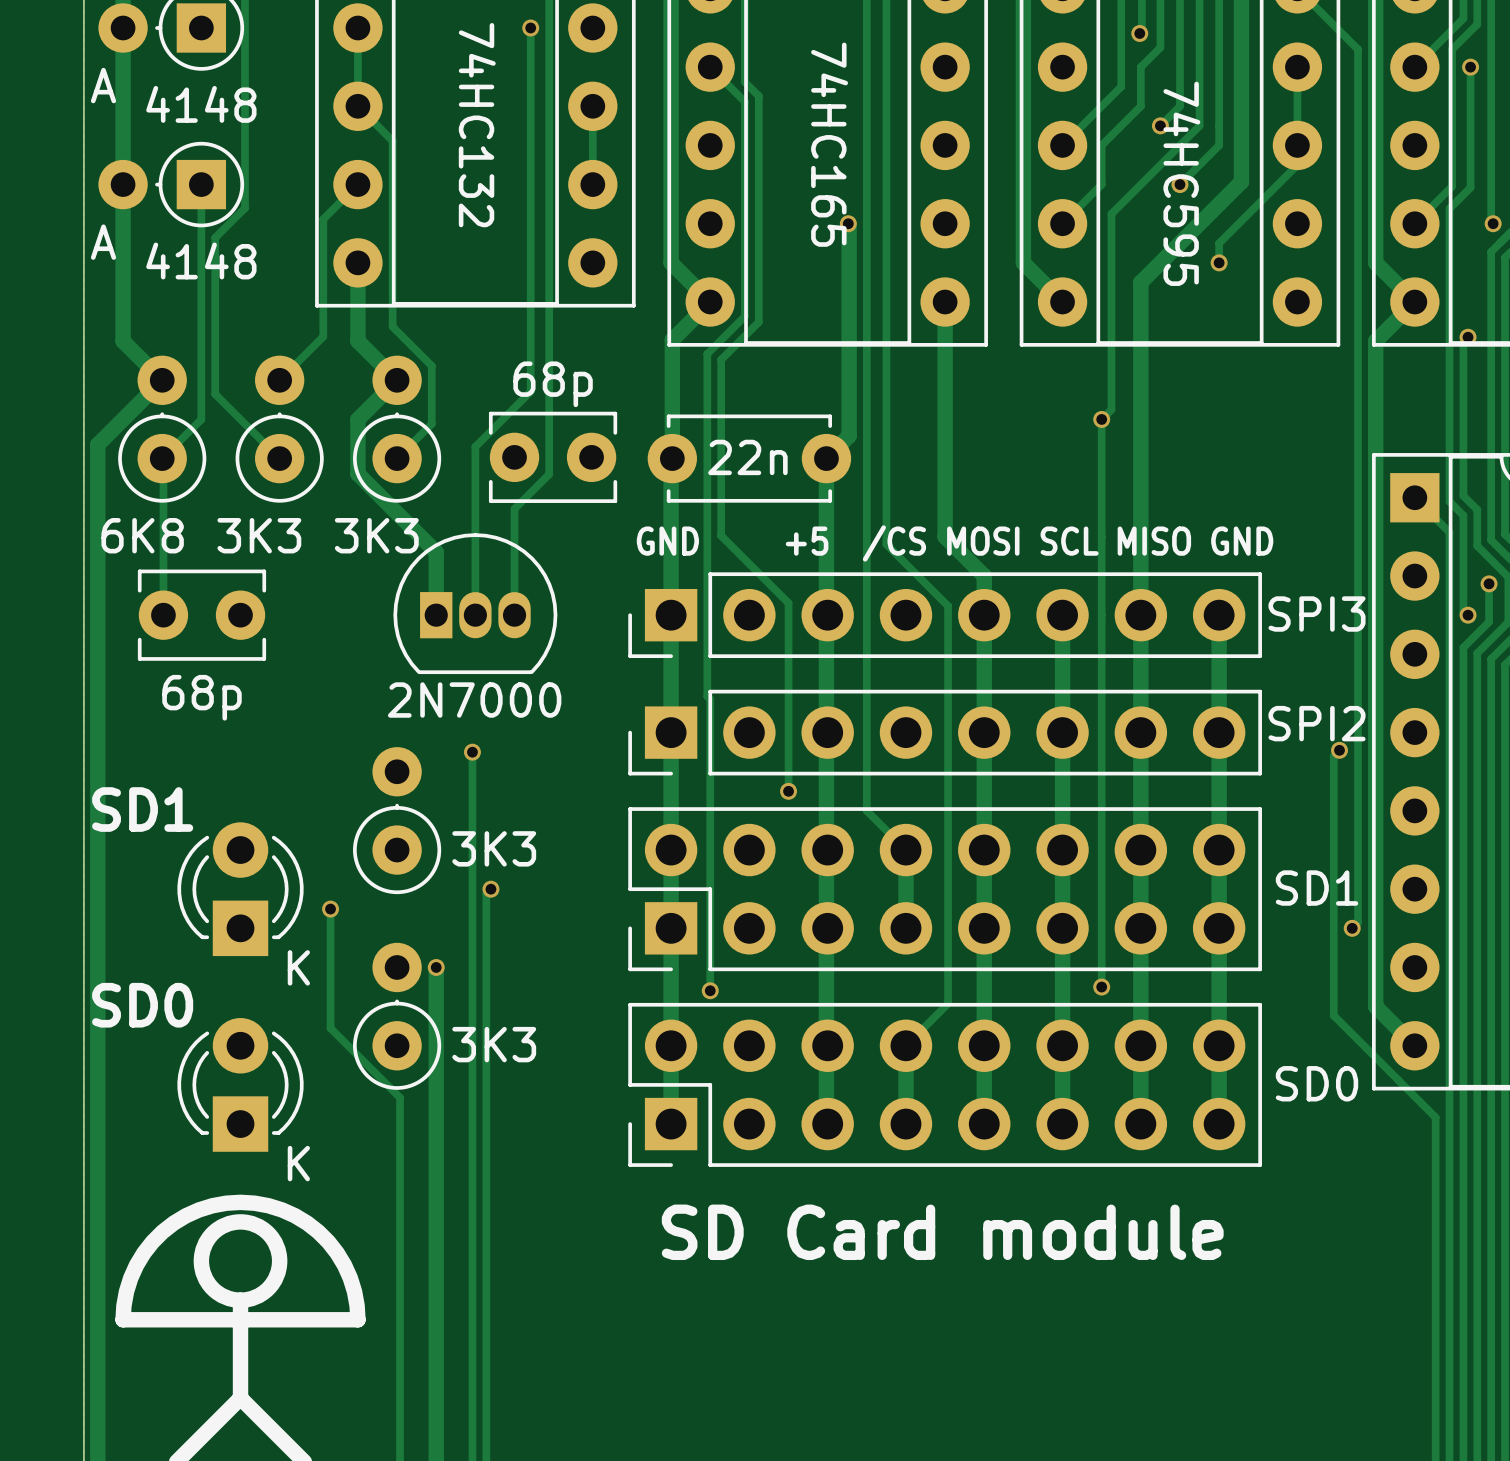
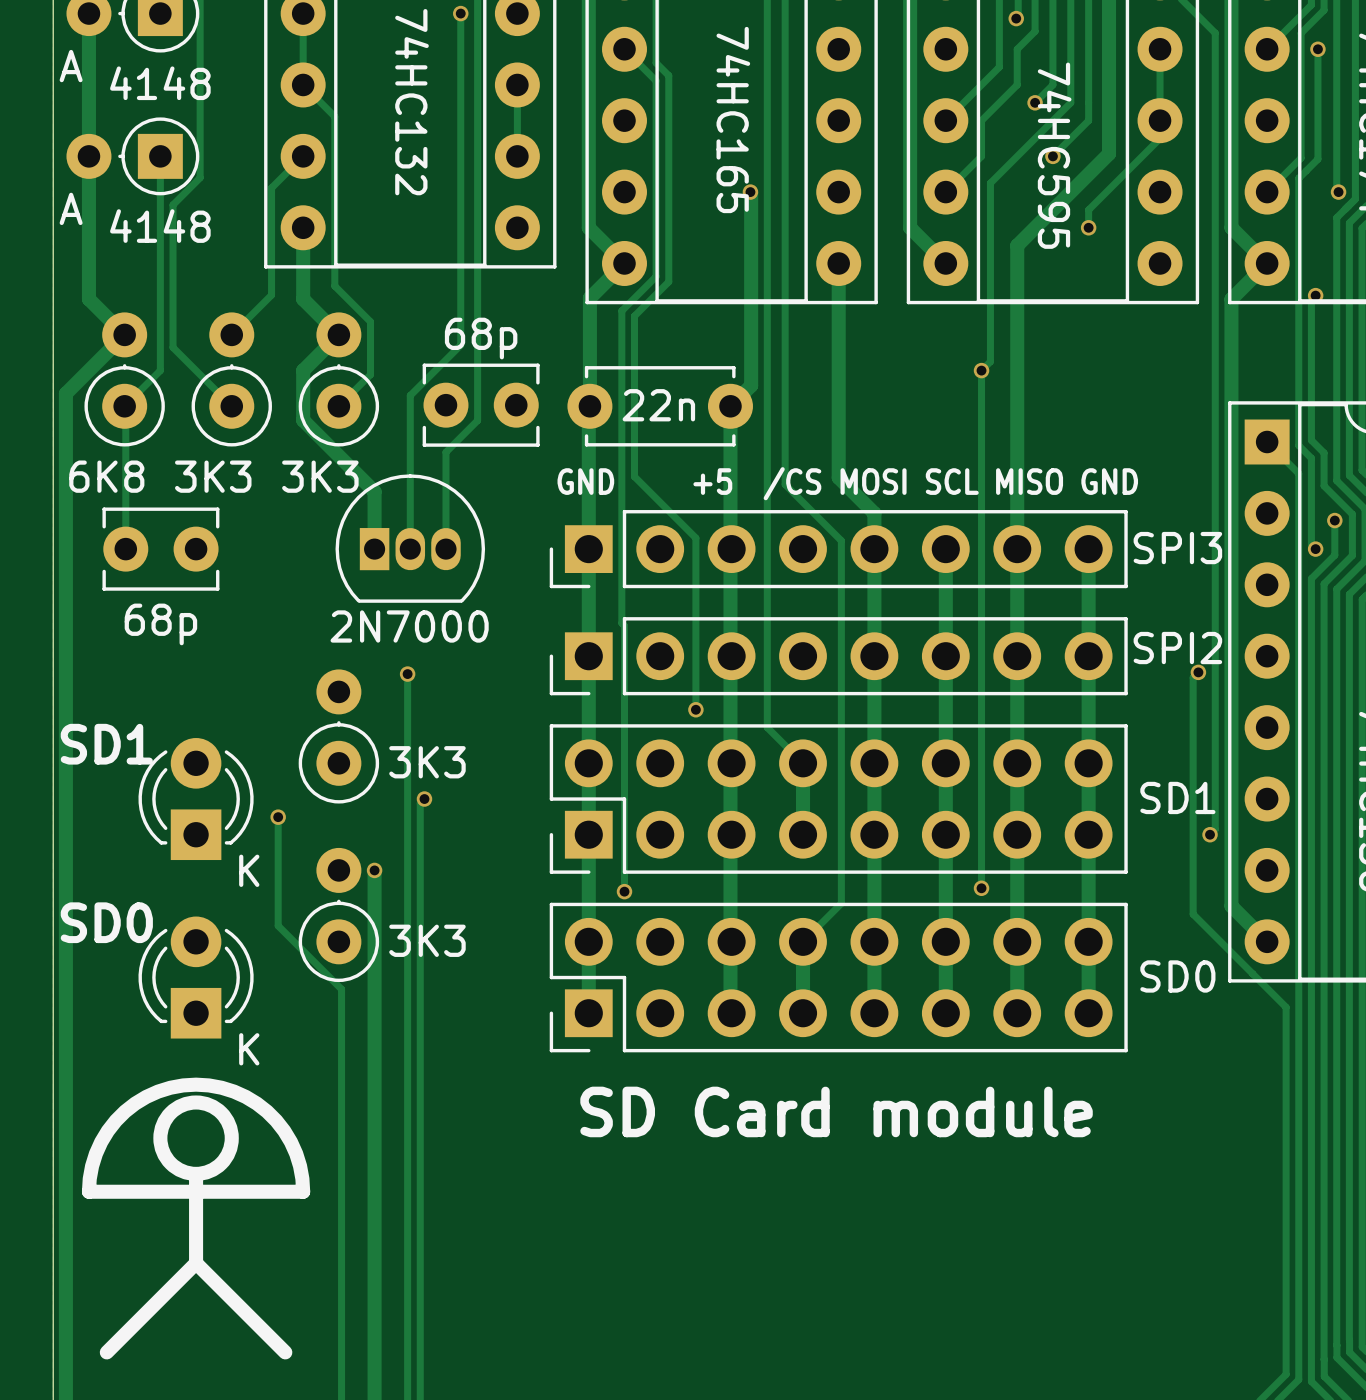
part value position: SD1 (142, 809) -> SD1 (106, 744)
part value position: SD0 (142, 1005) -> SD0 (106, 922)

